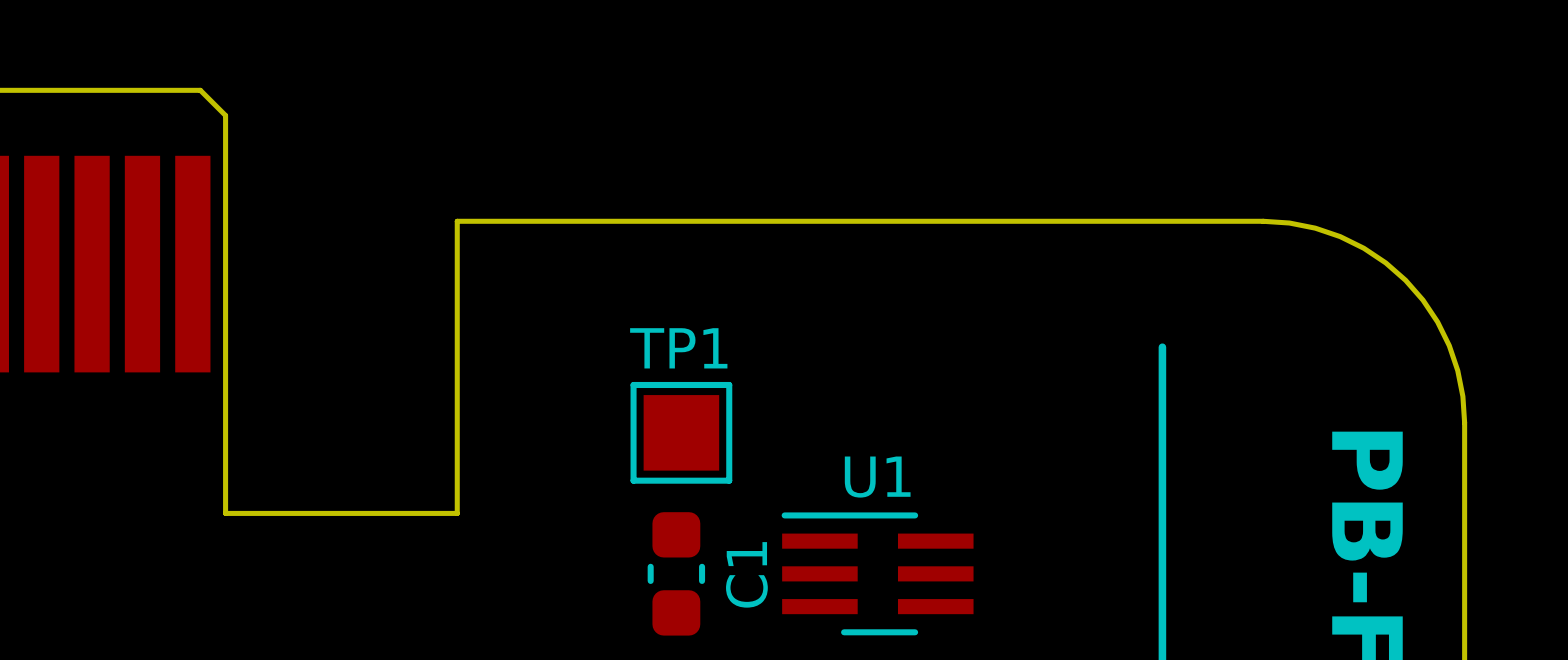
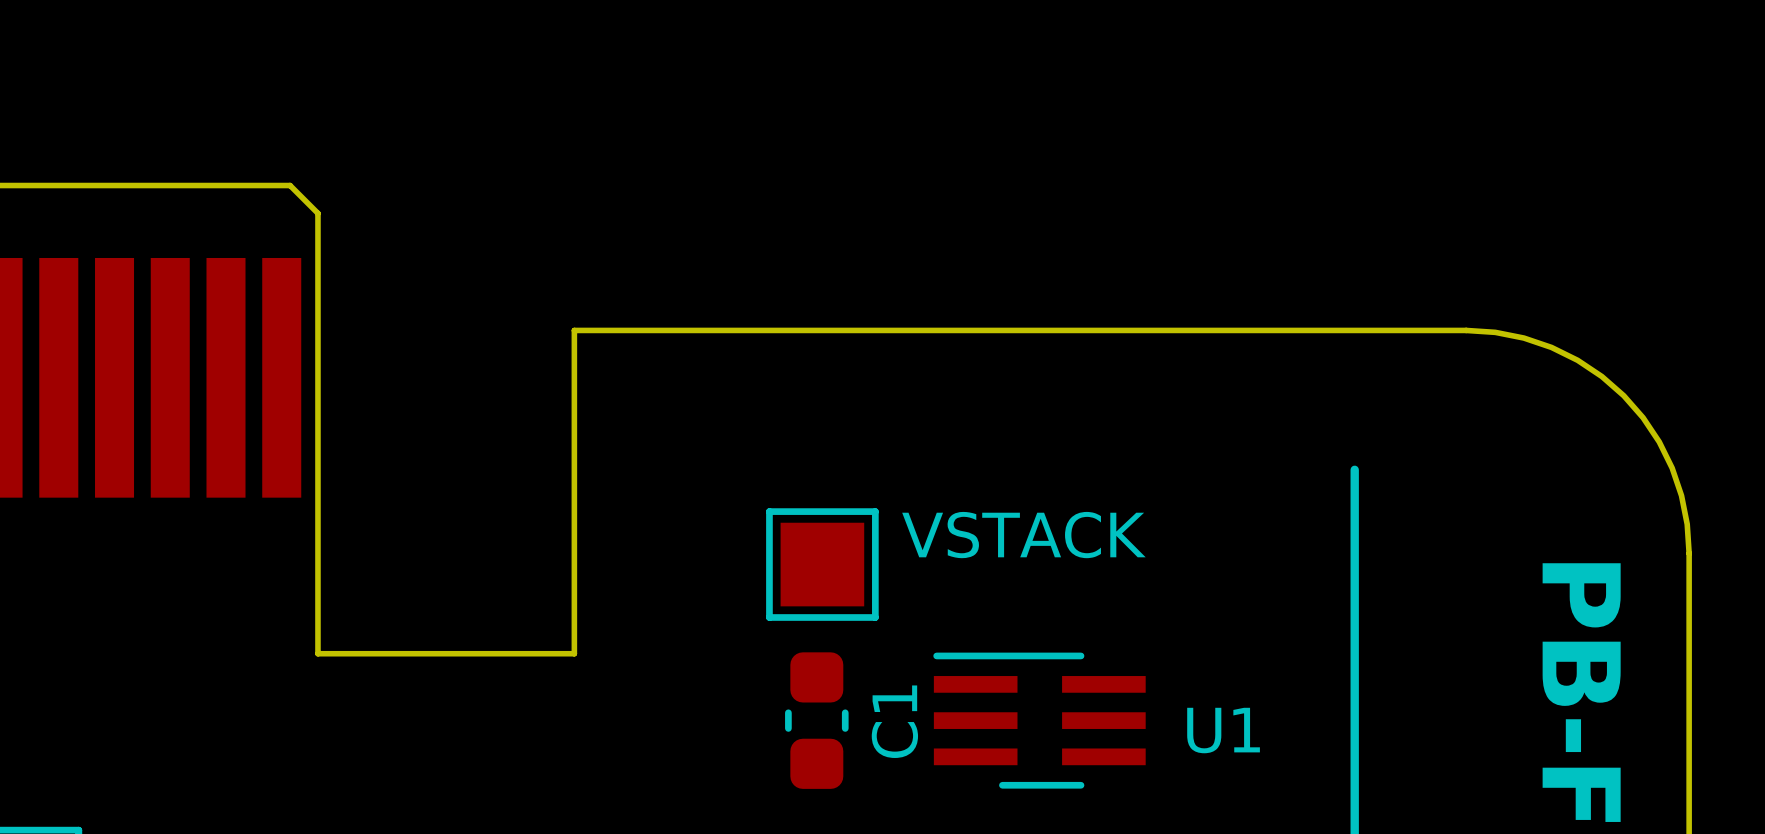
TP1 name: TP1 (678, 348) -> none
TP1 value: none -> VSTACK (1023, 535)
U1 name position: U1 (877, 477) -> U1 (1223, 730)

